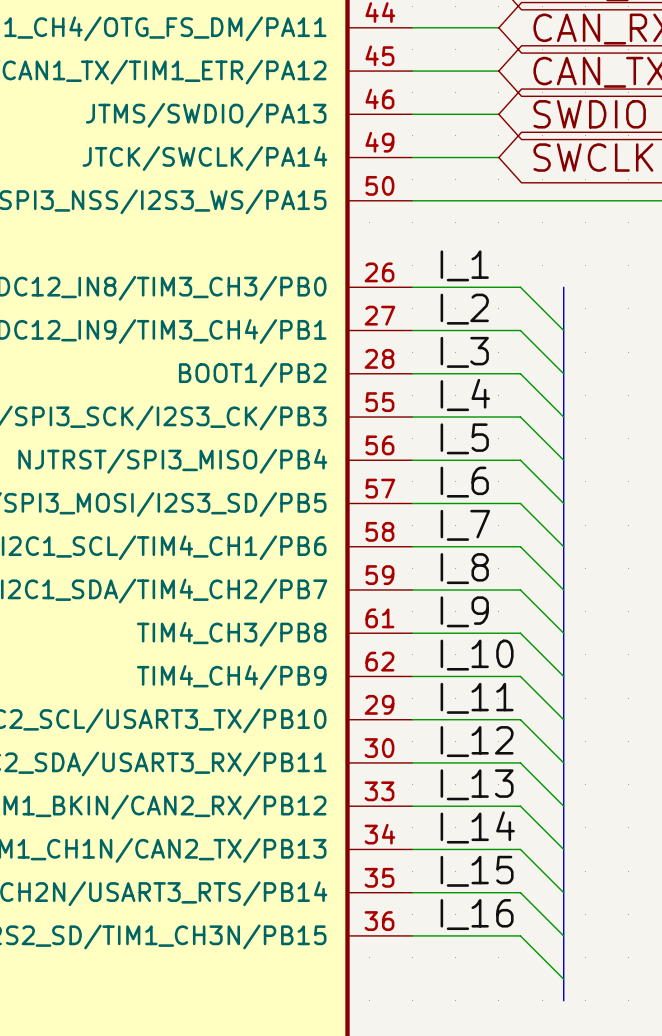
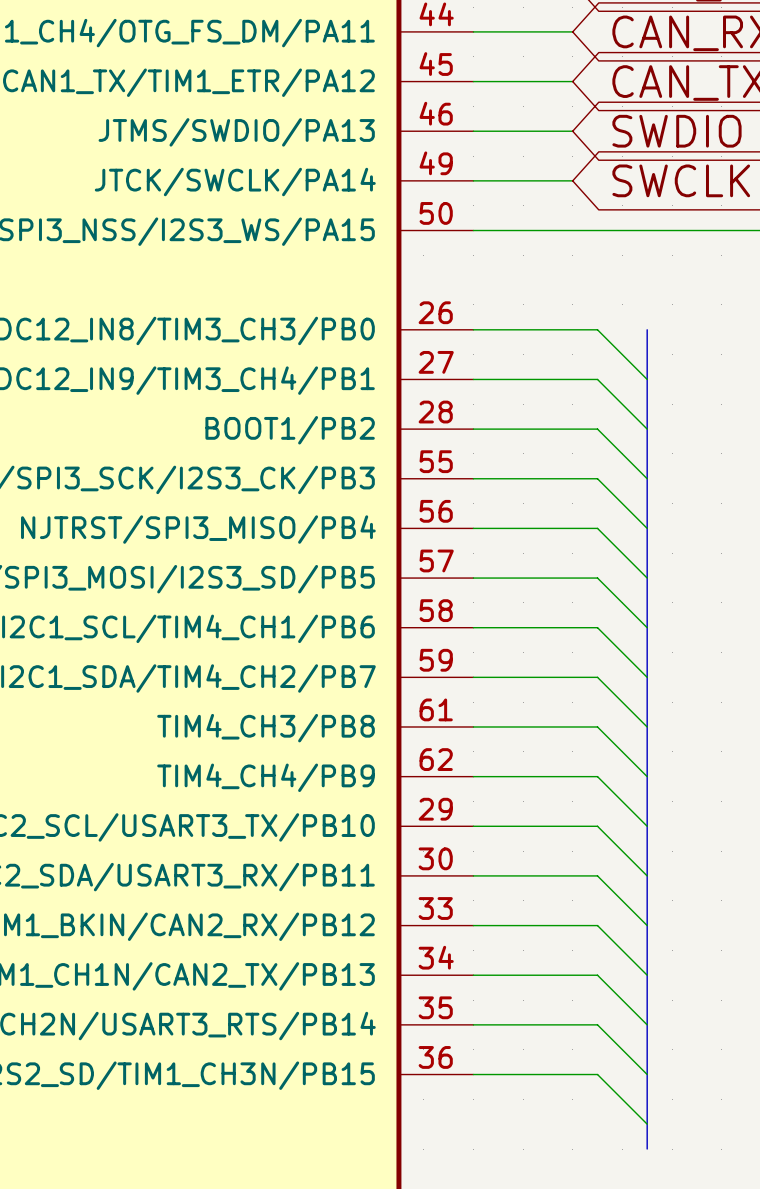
label: I_1 (464, 265) -> none
label: I_2 (464, 309) -> none
label: I_3 (464, 352) -> none
label: I_4 (465, 394) -> none
label: I_5 (464, 438) -> none
label: I_6 (464, 482) -> none
label: I_7 (465, 525) -> none
label: I_8 (464, 568) -> none
label: I_9 (464, 611) -> none
label: I_10 (477, 655) -> none
label: I_11 (477, 698) -> none
label: I_12 (477, 741) -> none
label: I_13 (477, 784) -> none
label: I_14 (477, 827) -> none
label: I_15 (477, 871) -> none
label: I_16 (477, 914) -> none

